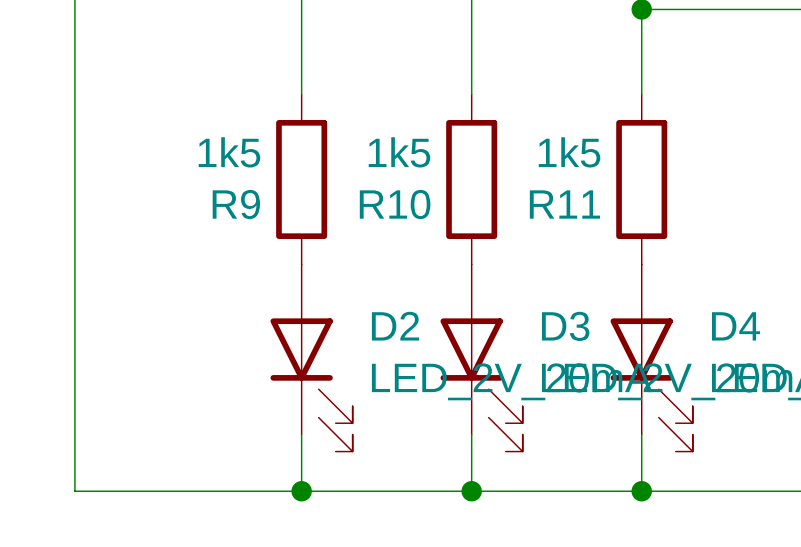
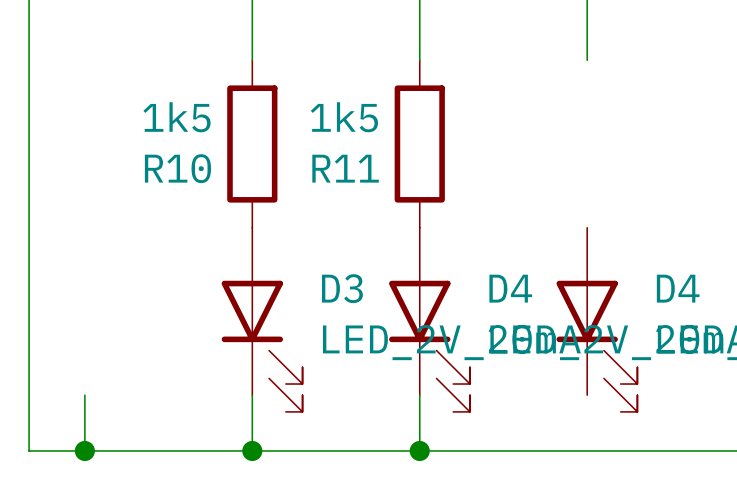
R11: 1k5 (641, 179) -> none
R9 name: R9 (236, 204) -> R10 (177, 168)
R10 name: R10 (395, 204) -> R11 (345, 168)
D2 name: D2 (395, 326) -> D3 (342, 288)
D3 name: D3 (565, 326) -> D4 (510, 288)
wire: (641, 434) (641, 491) -> (84, 395) (84, 450)
junction: none -> (84, 450)
junction: (641, 491) -> none

